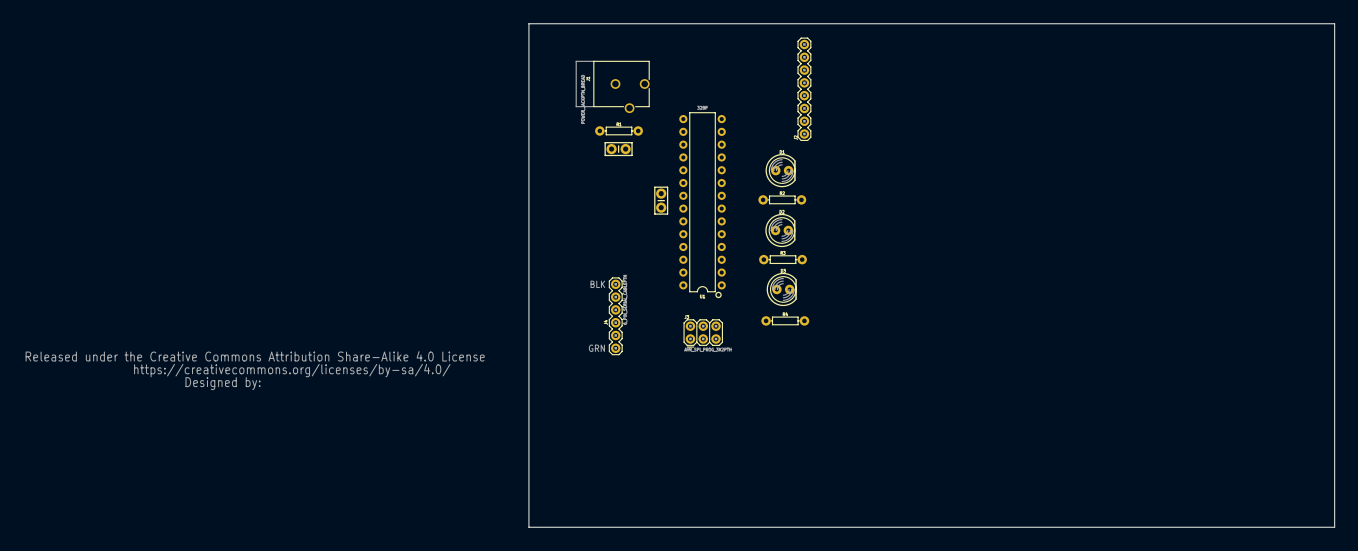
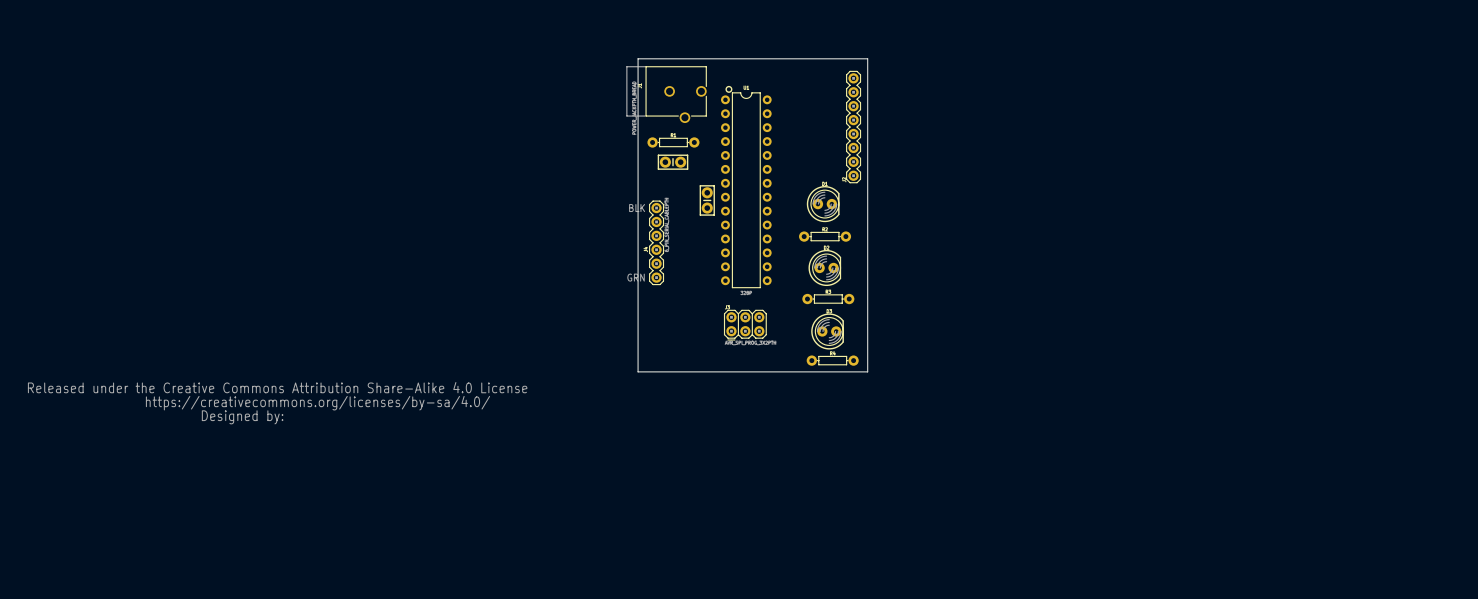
board edge: (528, 23) (1334, 23) (1334, 527) (528, 527) (528, 23) -> none
board edge: none -> (638, 58) (638, 371) (867, 371) (867, 58) (638, 58)
part position: (804, 89) -> (853, 127)
part position: (780, 170) -> (823, 204)
part position: (782, 199) -> (825, 236)
part position: (661, 200) -> (707, 200)
part rotation: 0° (702, 205) -> 180° (746, 187)
part position: (780, 230) -> (824, 267)
part position: (783, 259) -> (828, 299)
part position: (781, 289) -> (827, 331)
part position: (615, 316) -> (656, 242)
part position: (785, 320) -> (832, 360)
part position: (703, 333) -> (745, 325)

